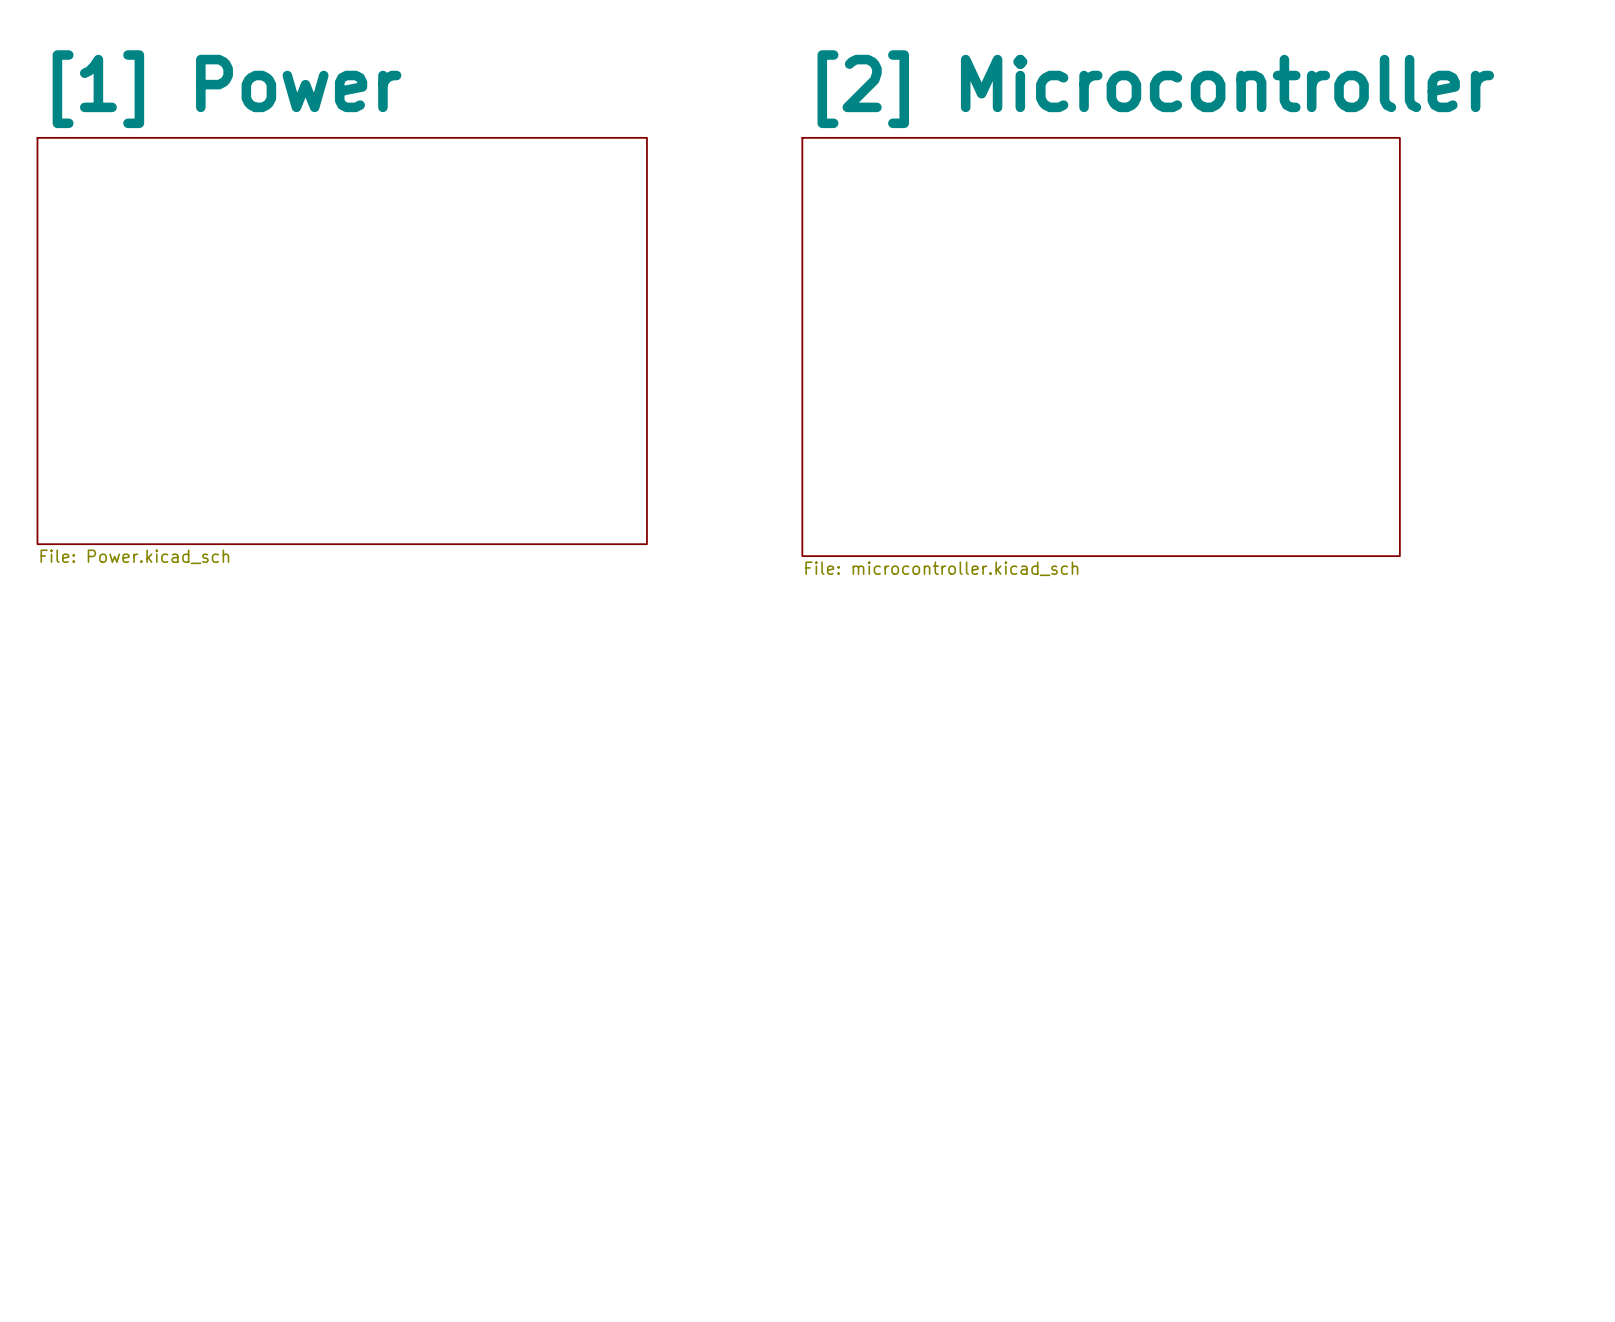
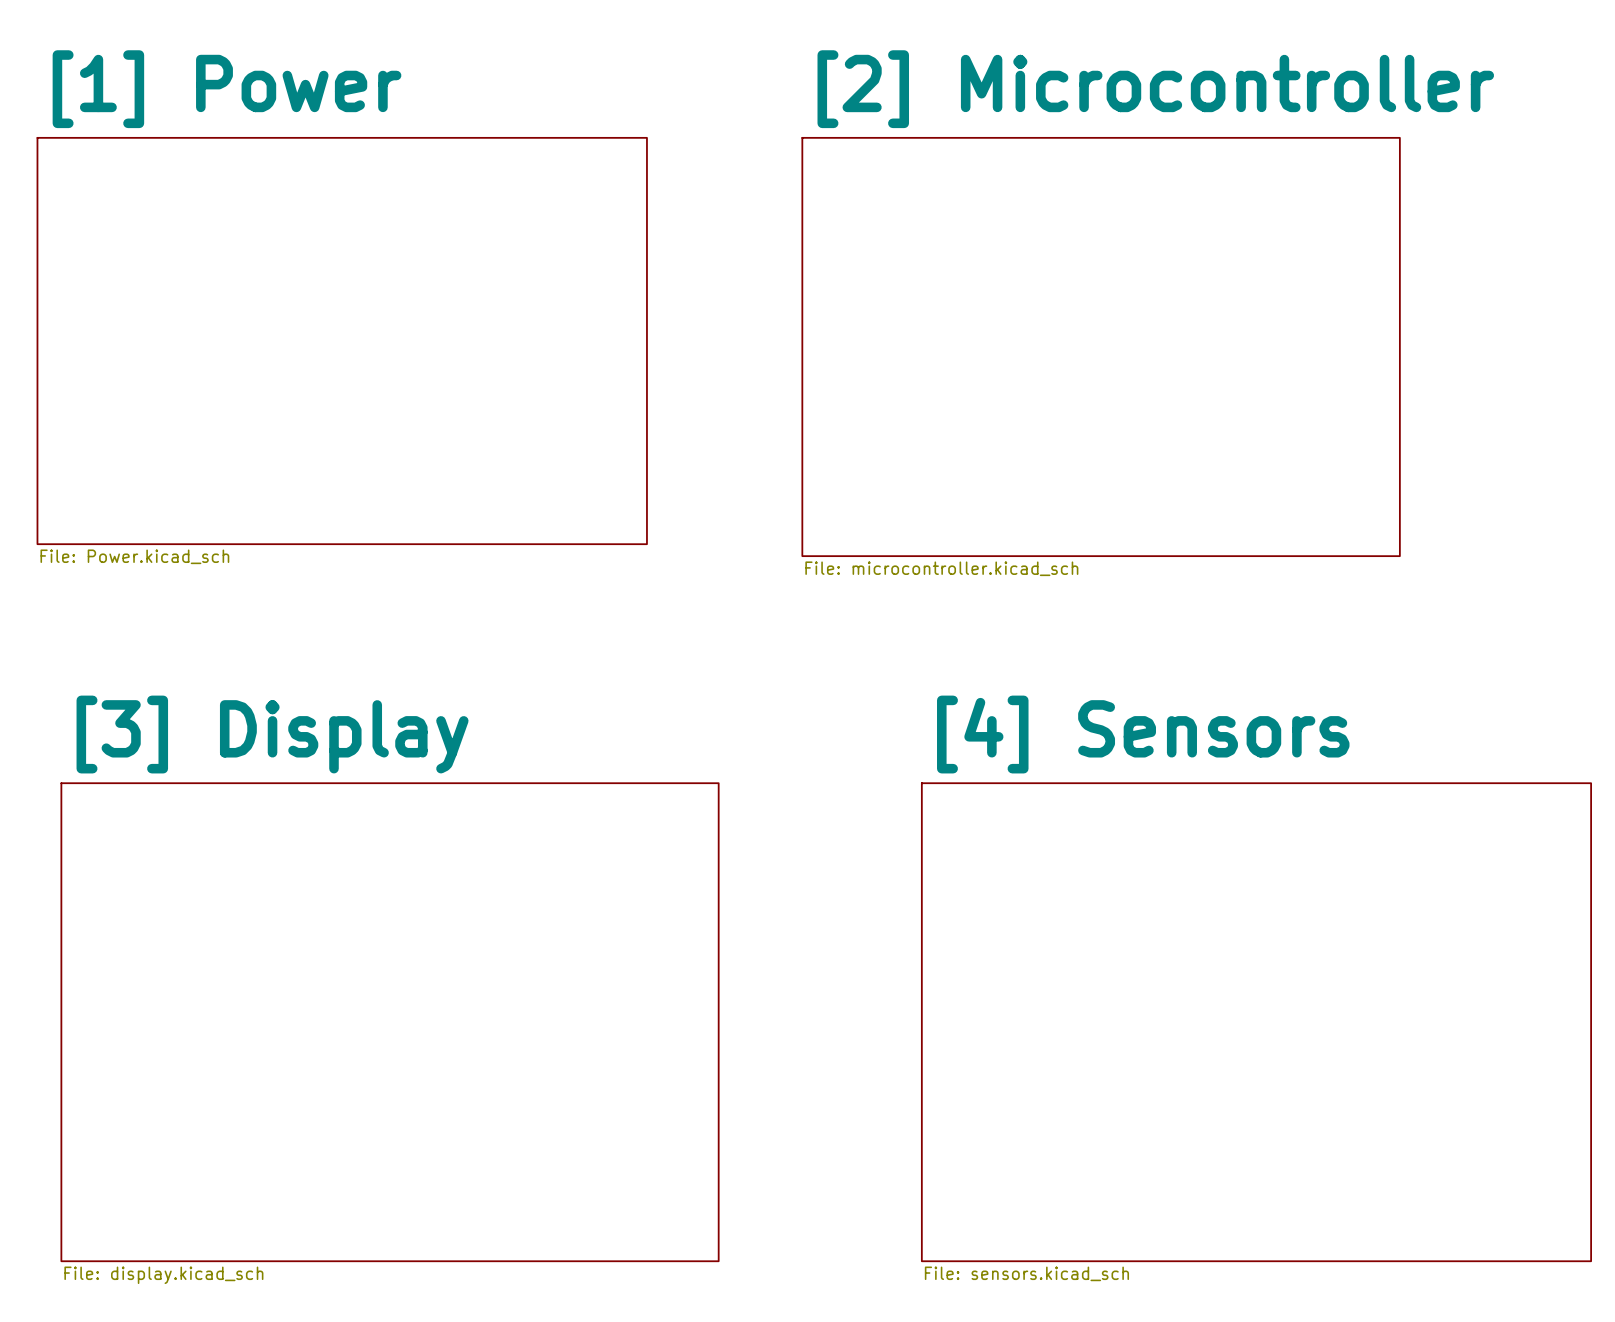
sheet [3] Display: none -> File: display.kicad_sch (390, 1022)
sheet [4] Sensors: none -> File: sensors.kicad_sch (1256, 1022)

